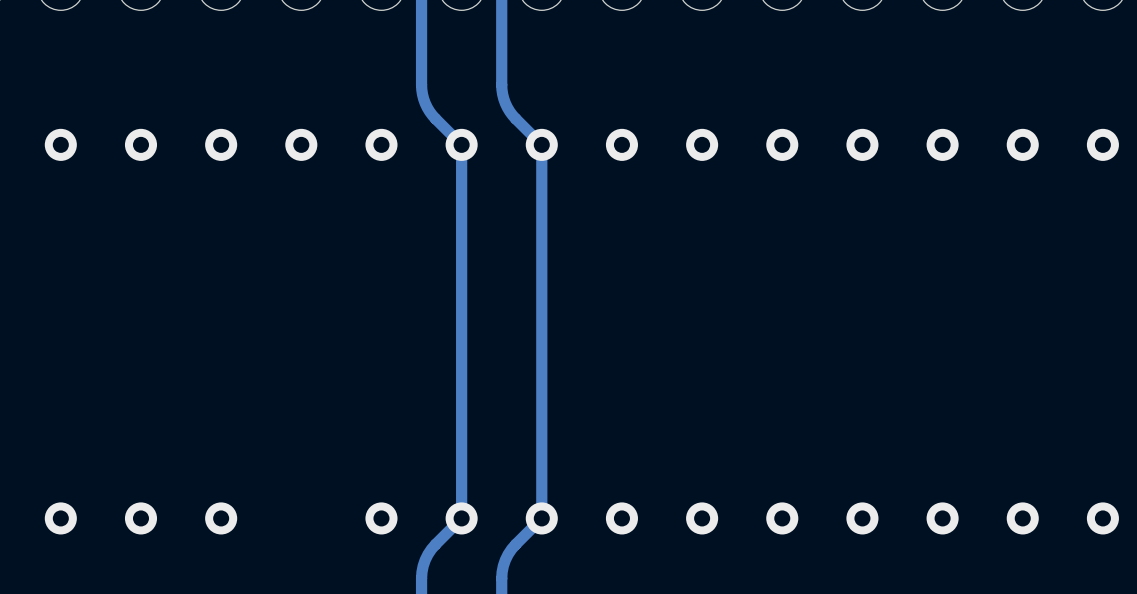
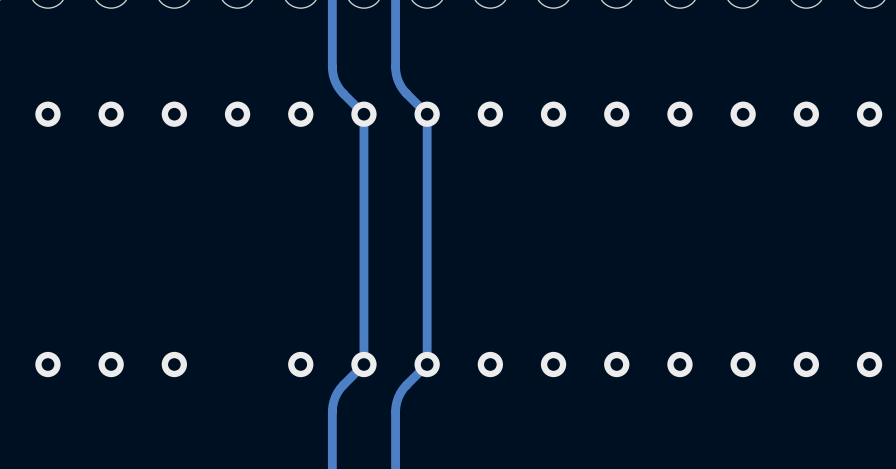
via: none -> (47, 364)
via: none -> (111, 364)
via: none -> (174, 364)
via: none -> (300, 364)
track: (461, 462) (461, 518) (427, 554) (423, 565) (421, 578) -> (363, 364) (340, 388) (335, 397) (332, 411) (332, 456)
via: none -> (363, 364)
track: (541, 462) (541, 518) (508, 554) (503, 565) (501, 578) -> (427, 364) (403, 388) (398, 397) (395, 411) (395, 456)
via: none -> (427, 364)
via: none -> (490, 364)
via: none -> (553, 364)
via: none -> (616, 364)
via: none -> (679, 364)
via: none -> (743, 364)
via: none -> (806, 364)
via: none -> (869, 364)
via: (60, 518) -> none
via: (140, 518) -> none
via: (221, 518) -> none
via: (381, 518) -> none
via: (461, 518) -> none
via: (541, 518) -> none
via: (621, 518) -> none
via: (702, 518) -> none
via: (782, 518) -> none
via: (862, 518) -> none
via: (942, 518) -> none
via: (1022, 518) -> none
via: (1102, 518) -> none

